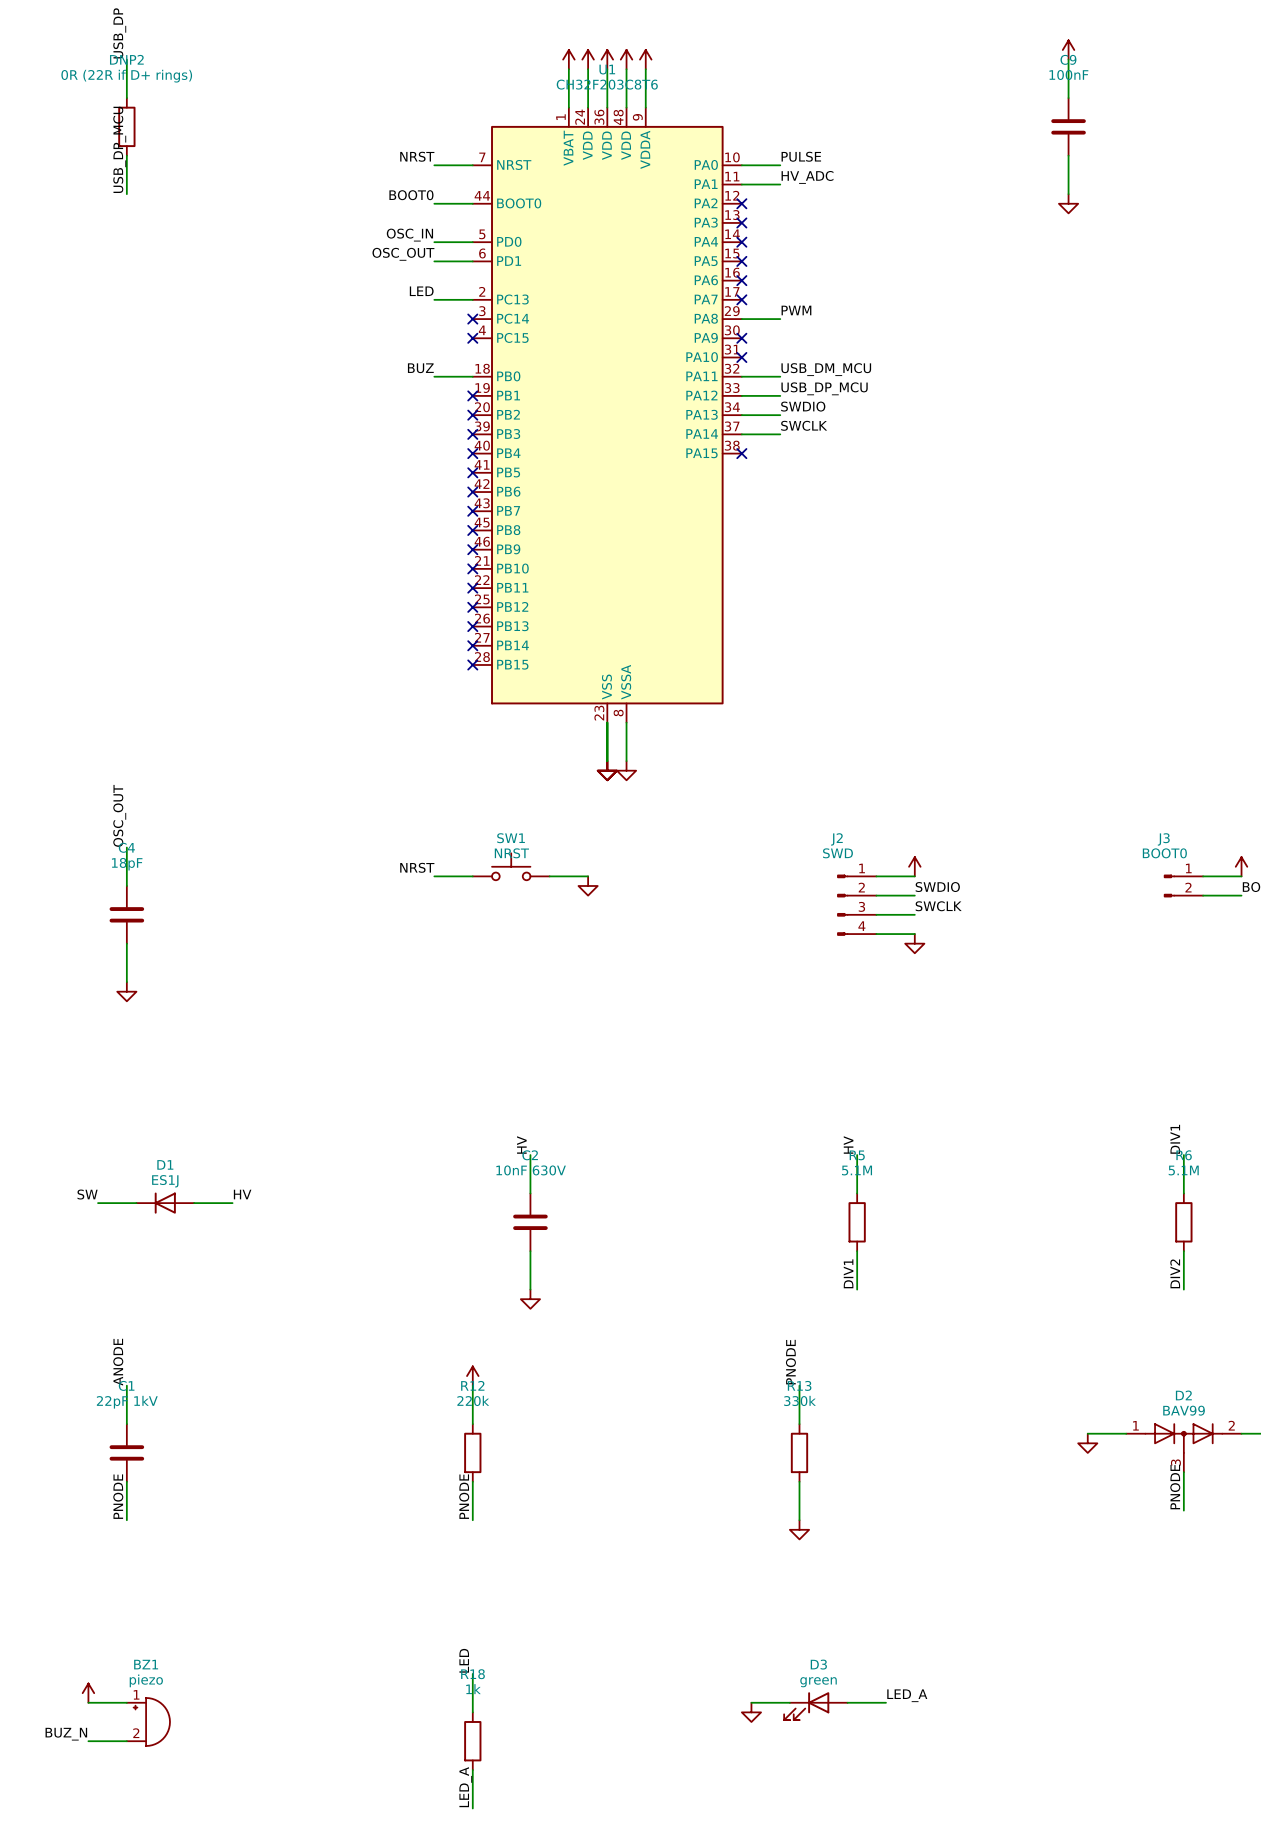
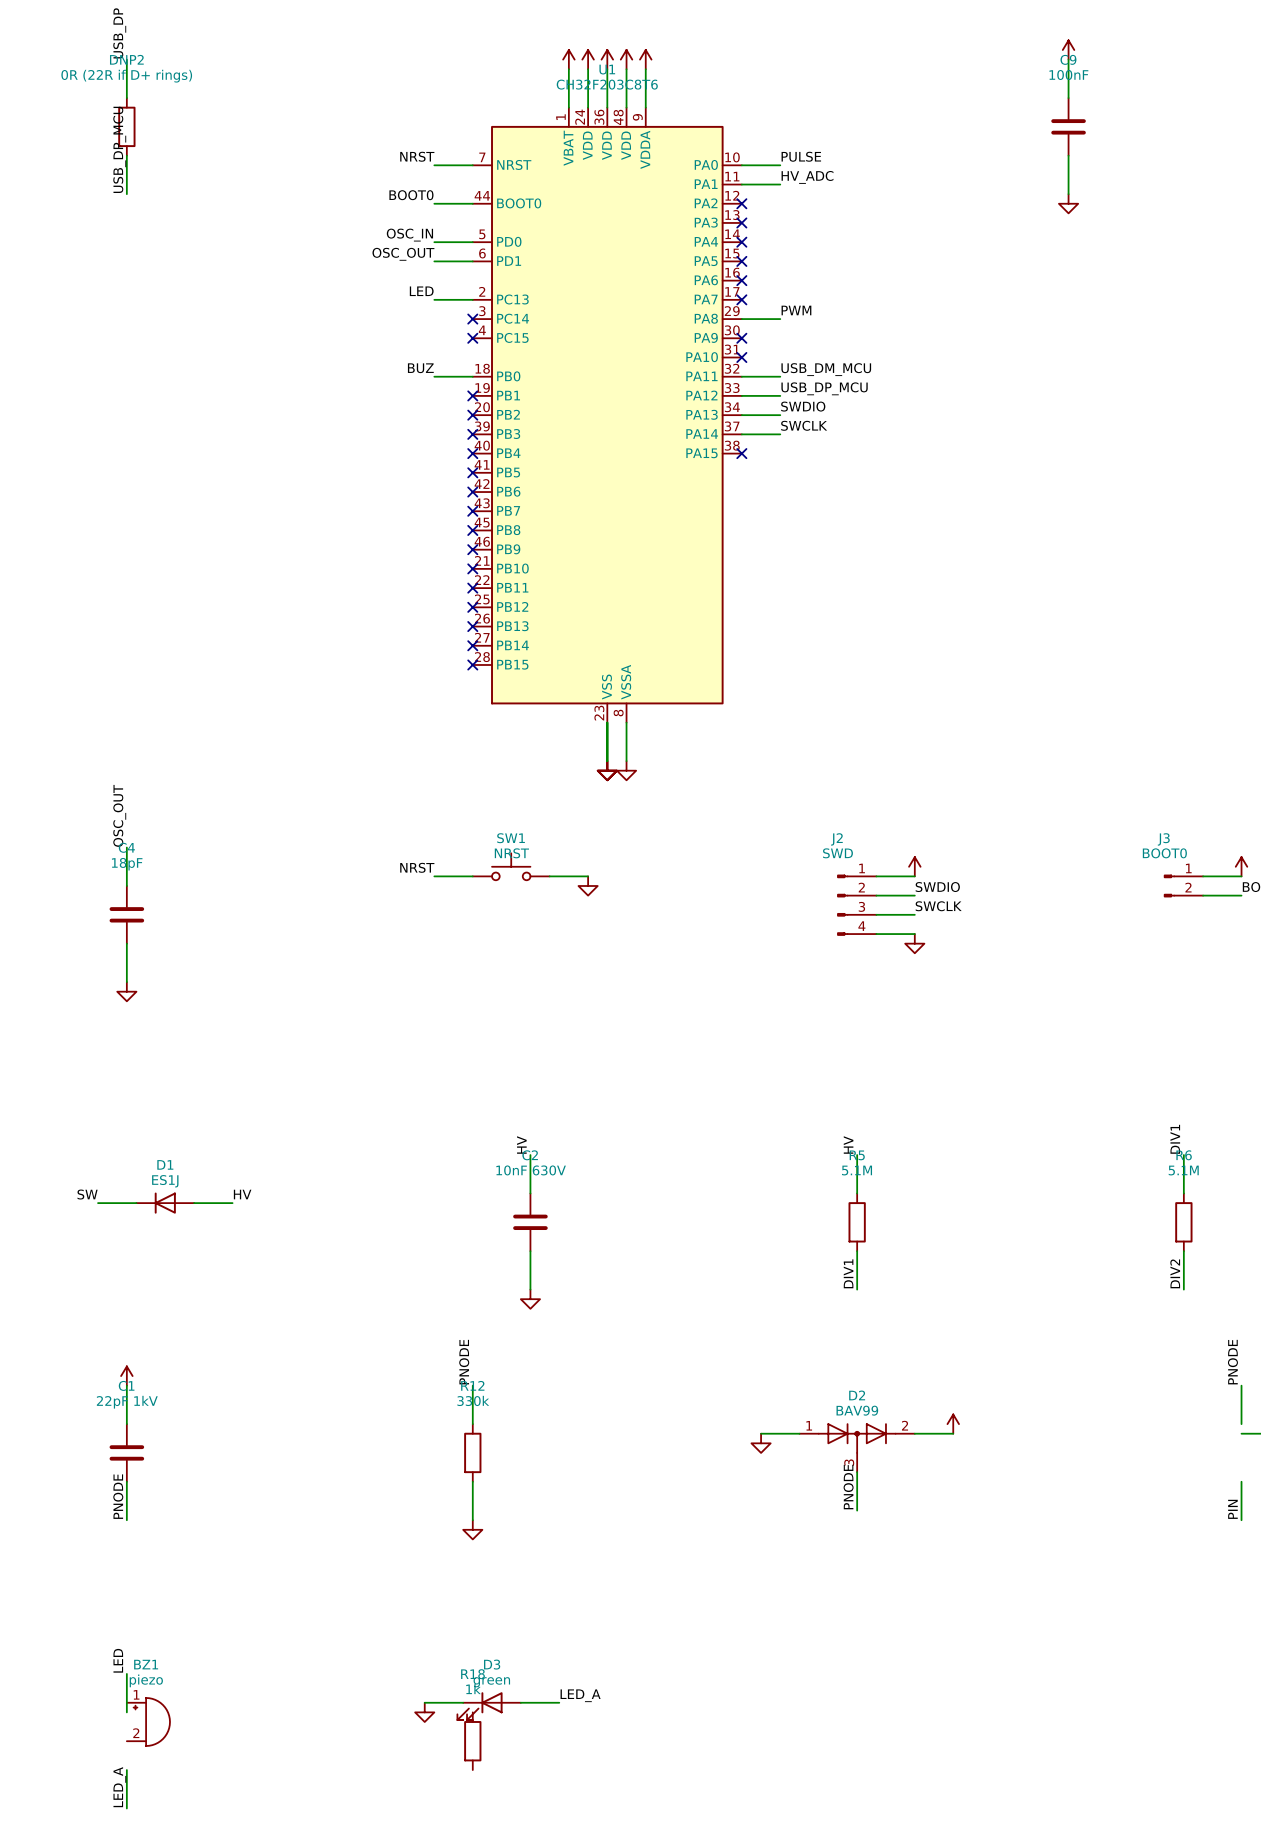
label: ANODE (118, 1362) -> none
label position: PNODE (790, 1362) -> PNODE (848, 1487)
power symbol: none -> (126, 1376)
power symbol: (472, 1376) -> none
wire: (799, 1385) (799, 1424) -> none
wire: none -> (1241, 1385) (1241, 1424)
R12 value: 220k (473, 1400) -> 330k (473, 1400)
power symbol: none -> (953, 1424)
wire: none -> (761, 1433) (799, 1433)
wire: (1087, 1433) (1126, 1433) -> (914, 1433) (953, 1433)
power symbol: (1087, 1443) -> none
D2 position: (1183, 1447) -> (857, 1447)
R13: 330k (799, 1452) -> none
wire: (1183, 1472) (1183, 1510) -> (1241, 1481) (1241, 1520)
wire: (799, 1481) (799, 1520) -> (857, 1472) (857, 1510)
label position: PNODE (1175, 1487) -> PNODE (1232, 1362)
label position: PNODE (464, 1496) -> PNODE (464, 1362)
label: none -> PIN (1232, 1509)
power symbol: none -> (472, 1529)
power symbol position: (799, 1529) -> (761, 1443)
label: none -> LED (118, 1660)
label: LED (464, 1660) -> none
wire: none -> (126, 1673) (126, 1712)
wire: (472, 1673) (472, 1712) -> none
power symbol: (88, 1693) -> none
label: LED_A (907, 1695) -> none
wire: (88, 1702) (126, 1702) -> none
wire: none -> (424, 1702) (463, 1702)
wire: none -> (520, 1702) (559, 1702)
wire: (751, 1702) (789, 1702) -> none
wire: (847, 1702) (885, 1702) -> none
D3 position: (815, 1706) -> (489, 1706)
power symbol: none -> (424, 1712)
power symbol: (751, 1712) -> none
label: BUZ_N (66, 1734) -> none
wire: (88, 1741) (126, 1741) -> none
wire: none -> (126, 1770) (126, 1808)
wire: (472, 1770) (472, 1808) -> none
label: none -> LED_A (119, 1787)
label rotation: 0° (465, 1787) -> 90° clockwise (580, 1695)
label position: LED_A (465, 1787) -> LED_A (580, 1695)

